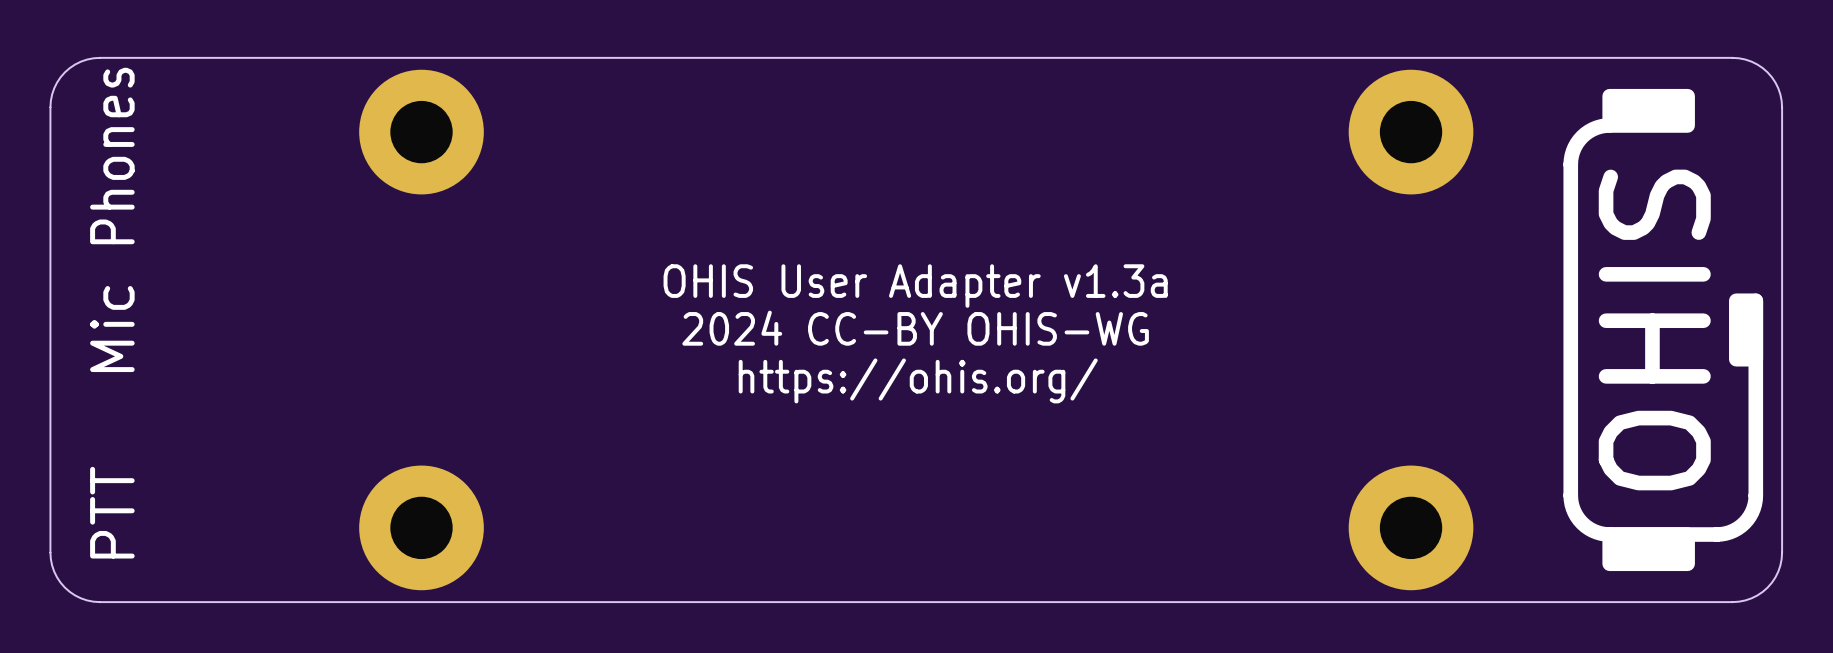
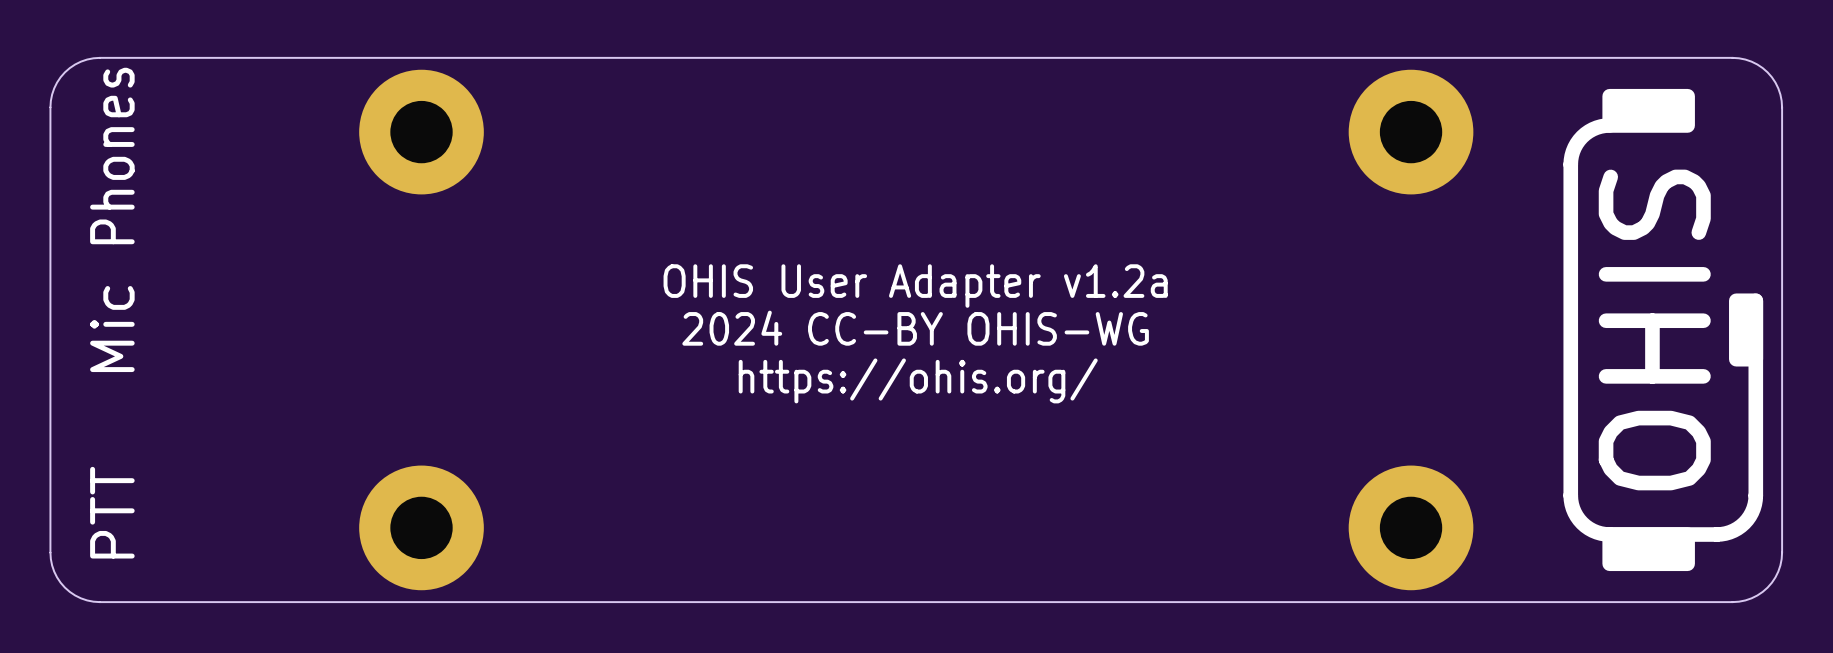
text: OHIS User Adapter v1.3a (915, 286) -> OHIS User Adapter v1.2a (915, 286)

